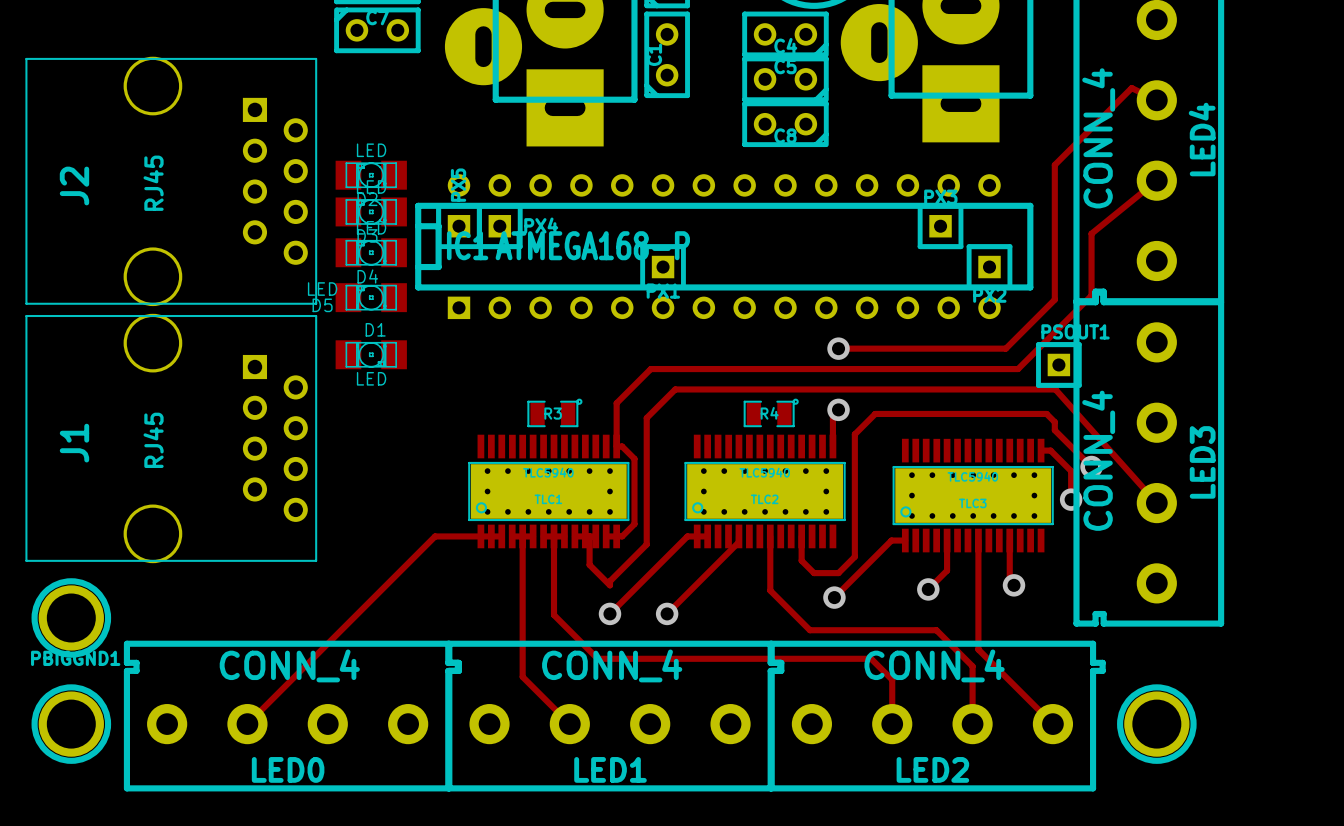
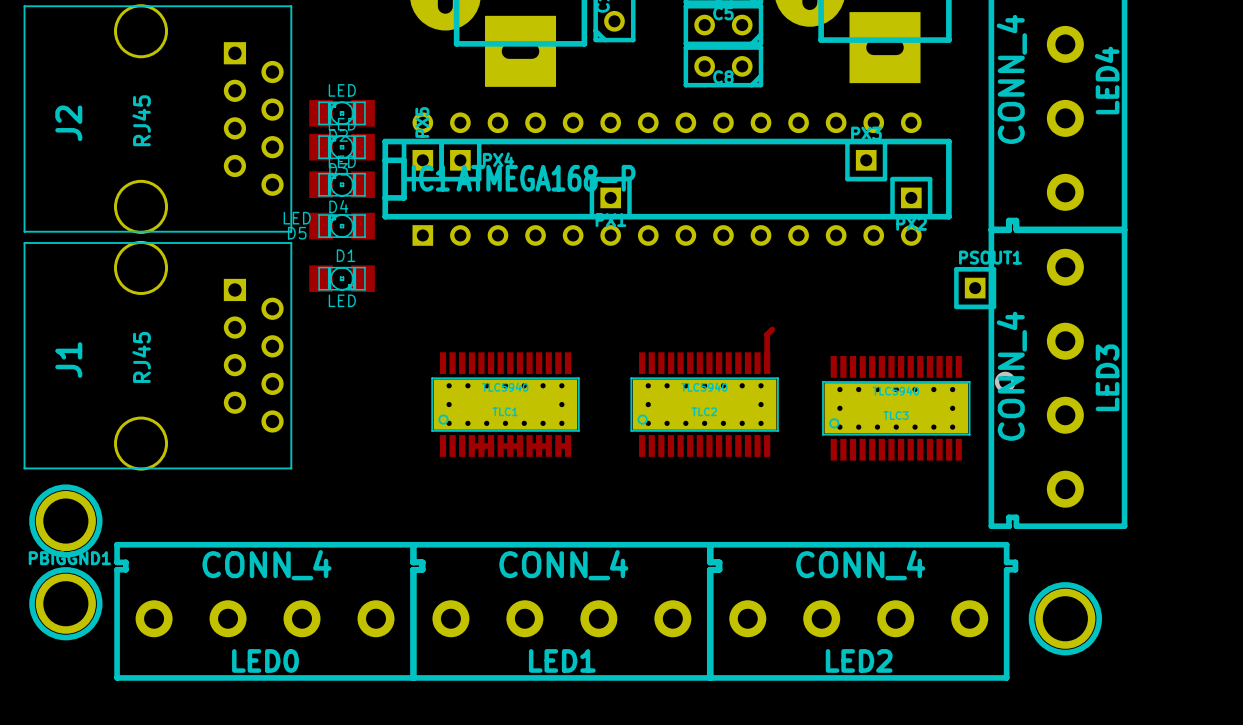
track: (1156, 100) (1131, 88) (1054, 165) (1054, 299) (1005, 348) (838, 348) -> none
track: (1156, 180) (1091, 233) (1091, 295) (1018, 369) (650, 369) (616, 403) (616, 446) (622, 446) (634, 458) (634, 524) (622, 536) (616, 536) -> none
via: (838, 348) -> none
via: (838, 409) -> none
R3: (554, 412) -> none
R4: (771, 412) -> none
track: (1041, 450) (1050, 450) (1071, 471) (1071, 499) -> none
track: (1091, 467) (1054, 430) (1054, 422) (1046, 413) (875, 413) (854, 434) (854, 556) (838, 573) (814, 573) (801, 560) (801, 536) -> none
via: (1071, 499) -> none
track: (1156, 503) (1055, 389) (675, 389) (646, 418) (646, 544) (609, 581) (609, 585) (589, 564) (589, 536) -> none
track: (501, 536) (435, 536) (247, 724) -> none
track: (522, 536) (522, 676) (569, 724) -> none
track: (554, 536) (554, 615) (597, 658) (871, 658) (892, 679) (892, 724) -> none
track: (707, 536) (687, 536) (609, 613) -> none
track: (738, 536) (738, 542) (667, 613) -> none
track: (770, 536) (770, 590) (809, 630) (936, 630) (972, 666) (972, 724) -> none
track: (905, 540) (891, 540) (834, 597) -> none
track: (947, 540) (947, 570) (928, 589) -> none
track: (978, 540) (978, 649) (1052, 724) -> none
track: (1009, 540) (1009, 581) (1014, 585) -> none
via: (1014, 585) -> none
via: (928, 589) -> none
via: (834, 597) -> none
via: (609, 613) -> none
via: (667, 613) -> none
part position: (71, 724) -> (65, 603)

